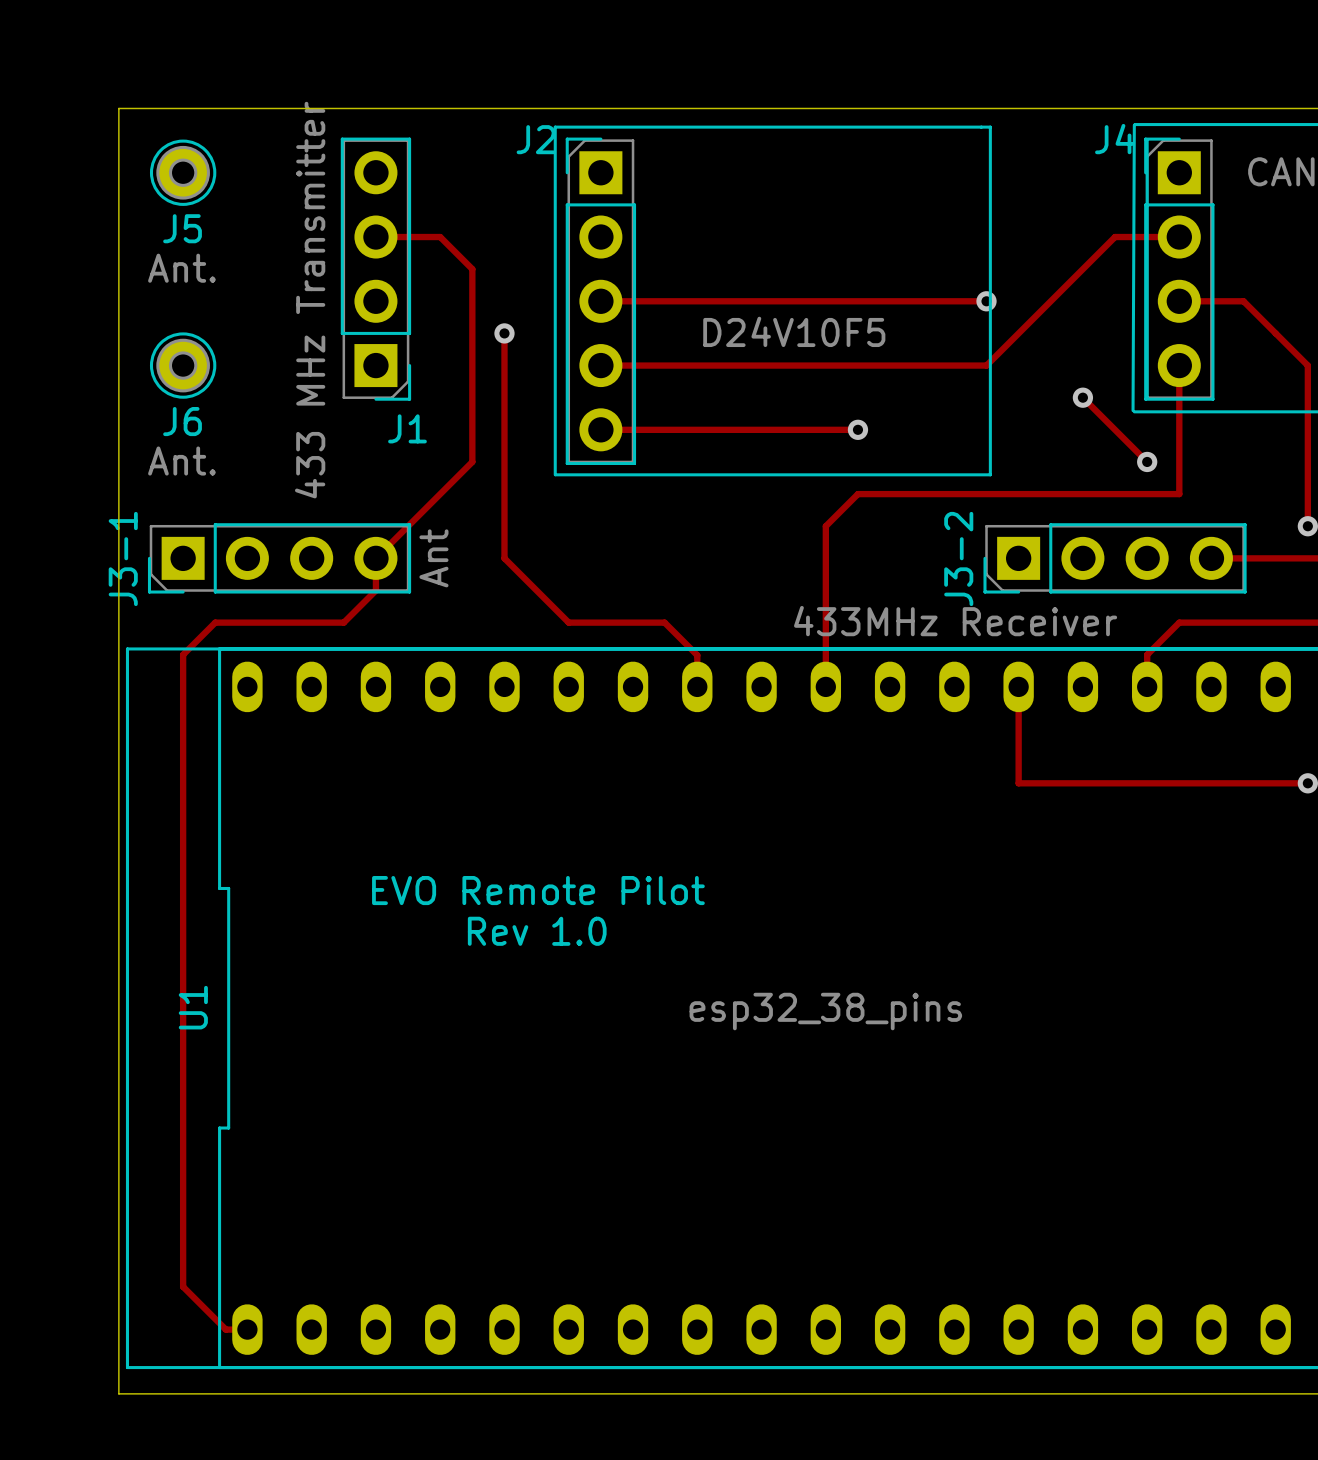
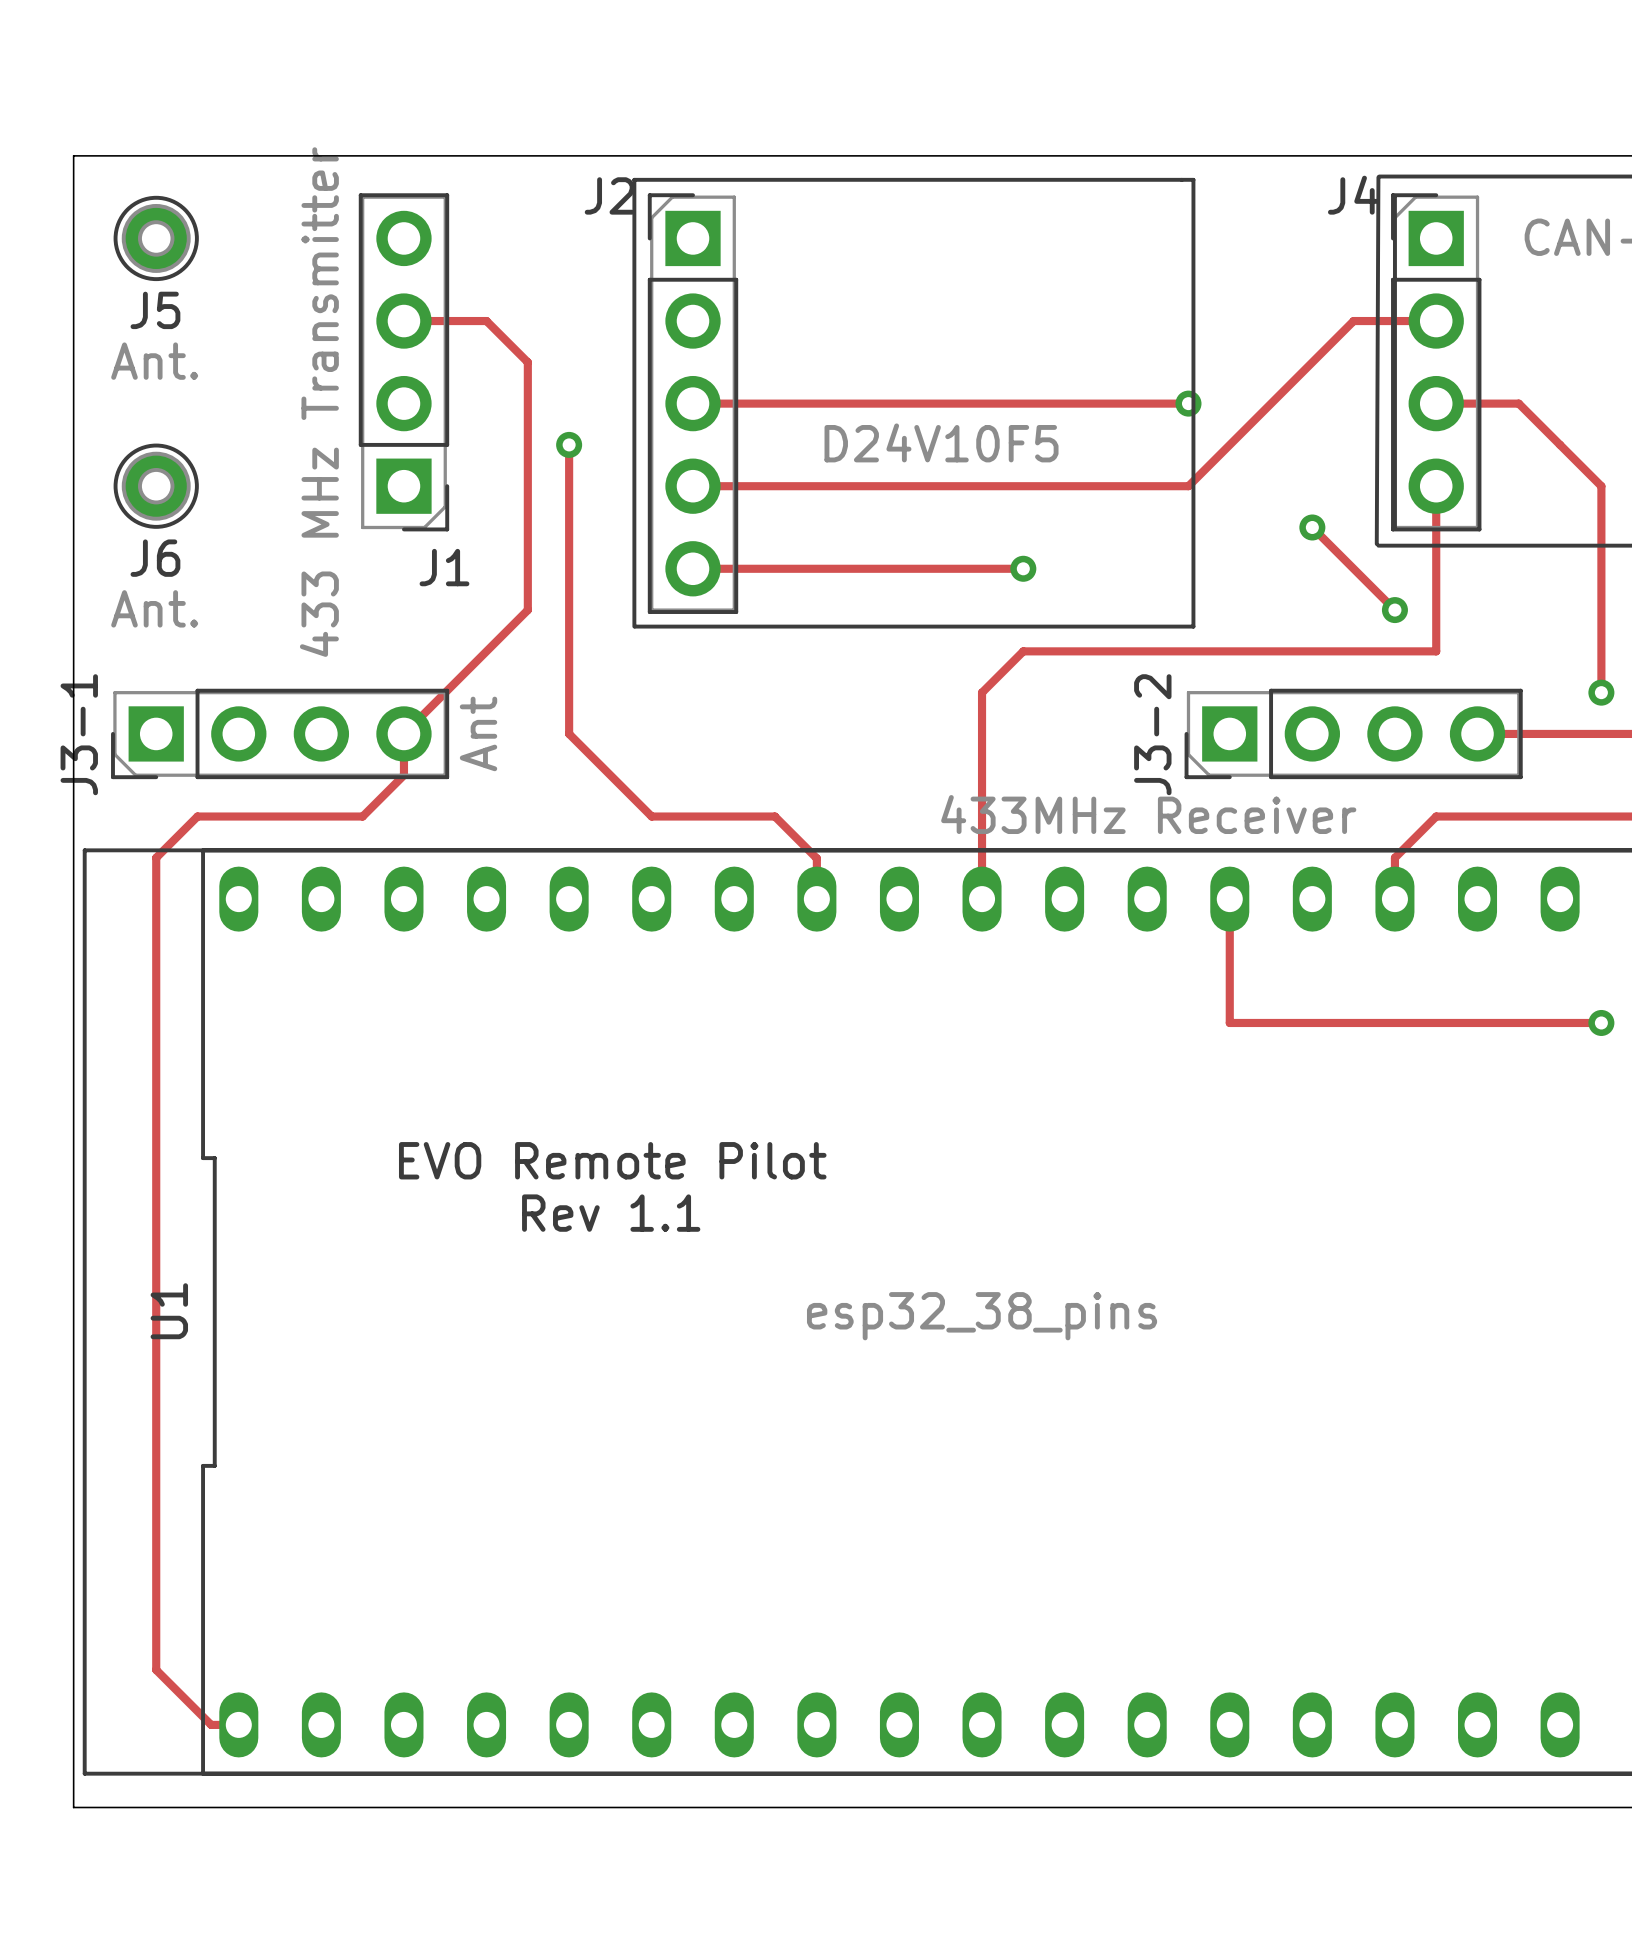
text: Rev 1.0 (537, 931) -> Rev 1.1 (611, 1213)

